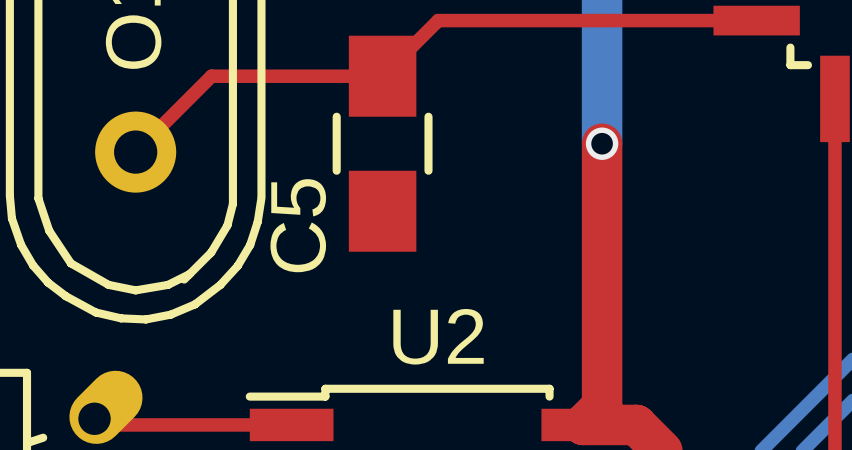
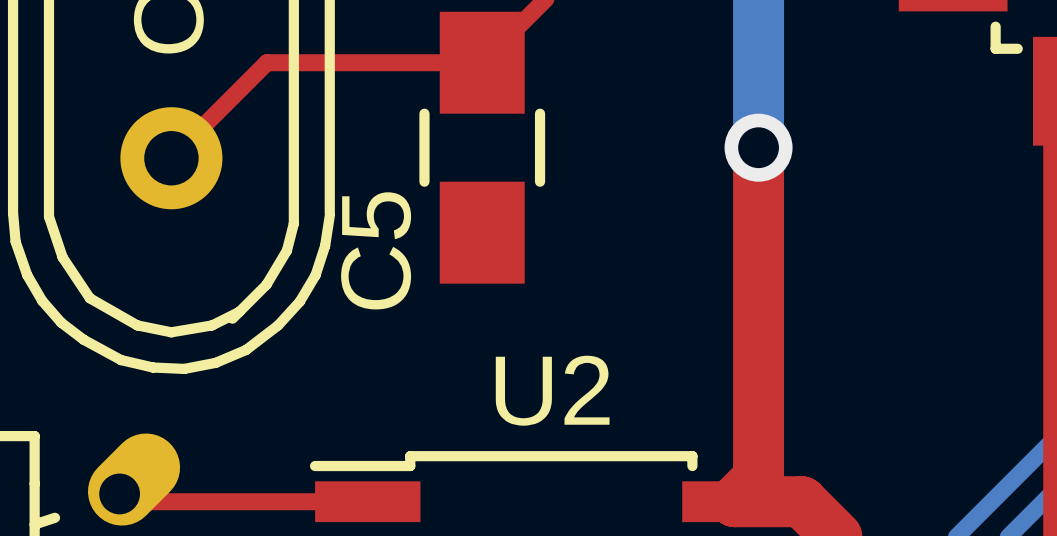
via size: [585, 127, 619, 160] -> [724, 113, 793, 182]

